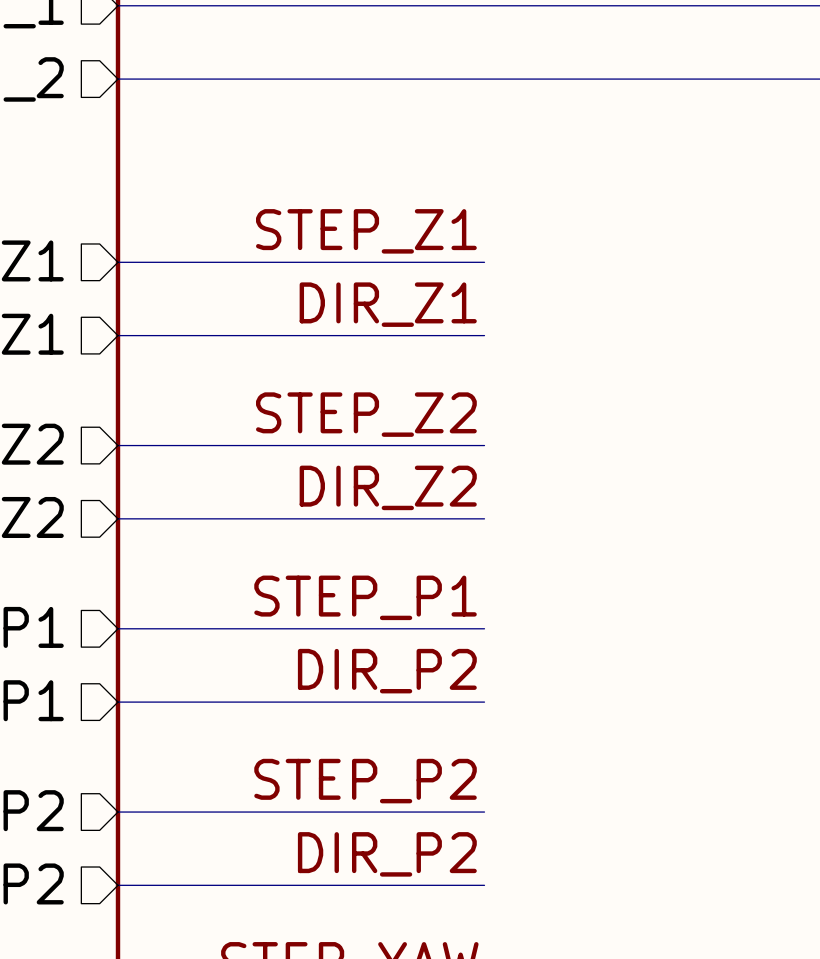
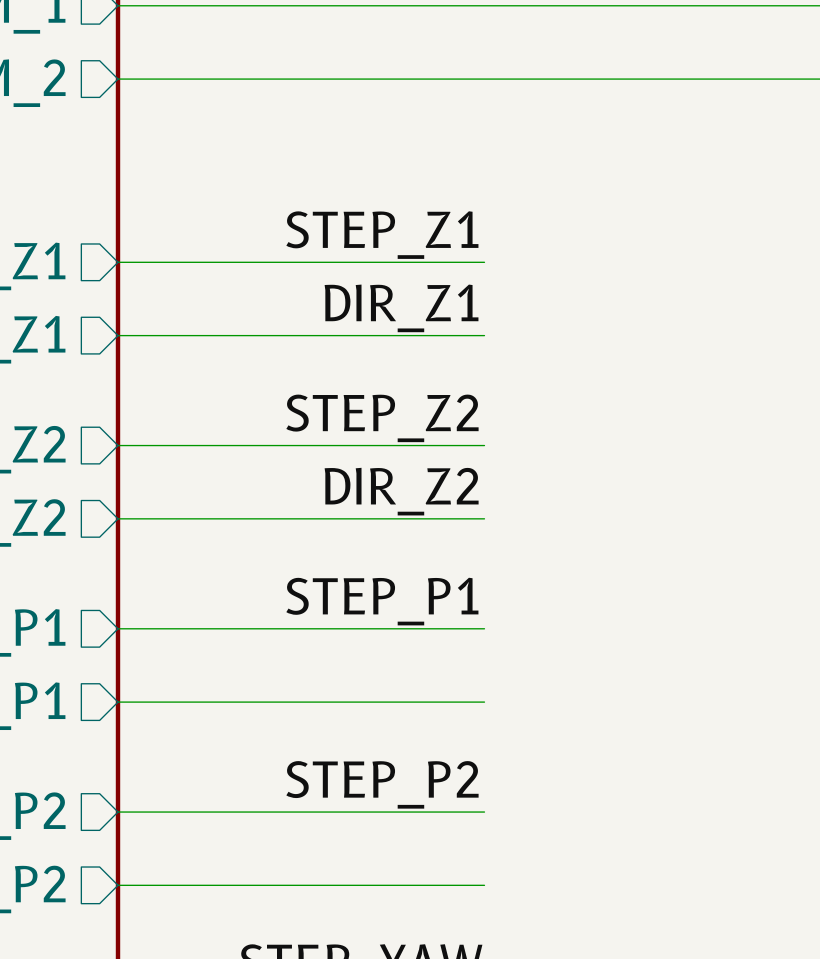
label: DIR_P2 (387, 671) -> none
label: DIR_P2 (387, 854) -> none

